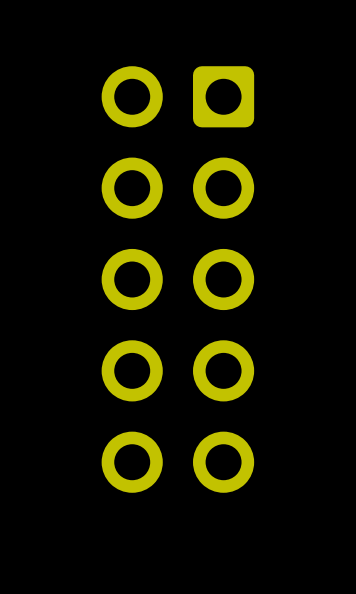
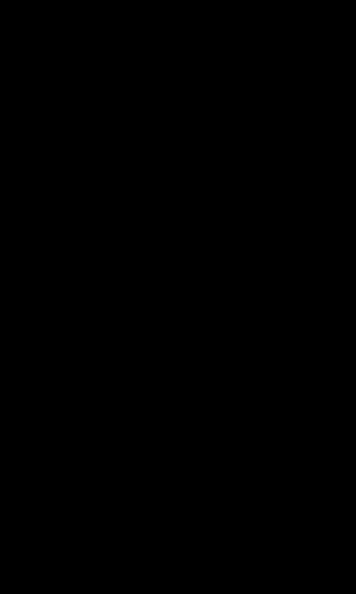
part: (177, 279) -> none

